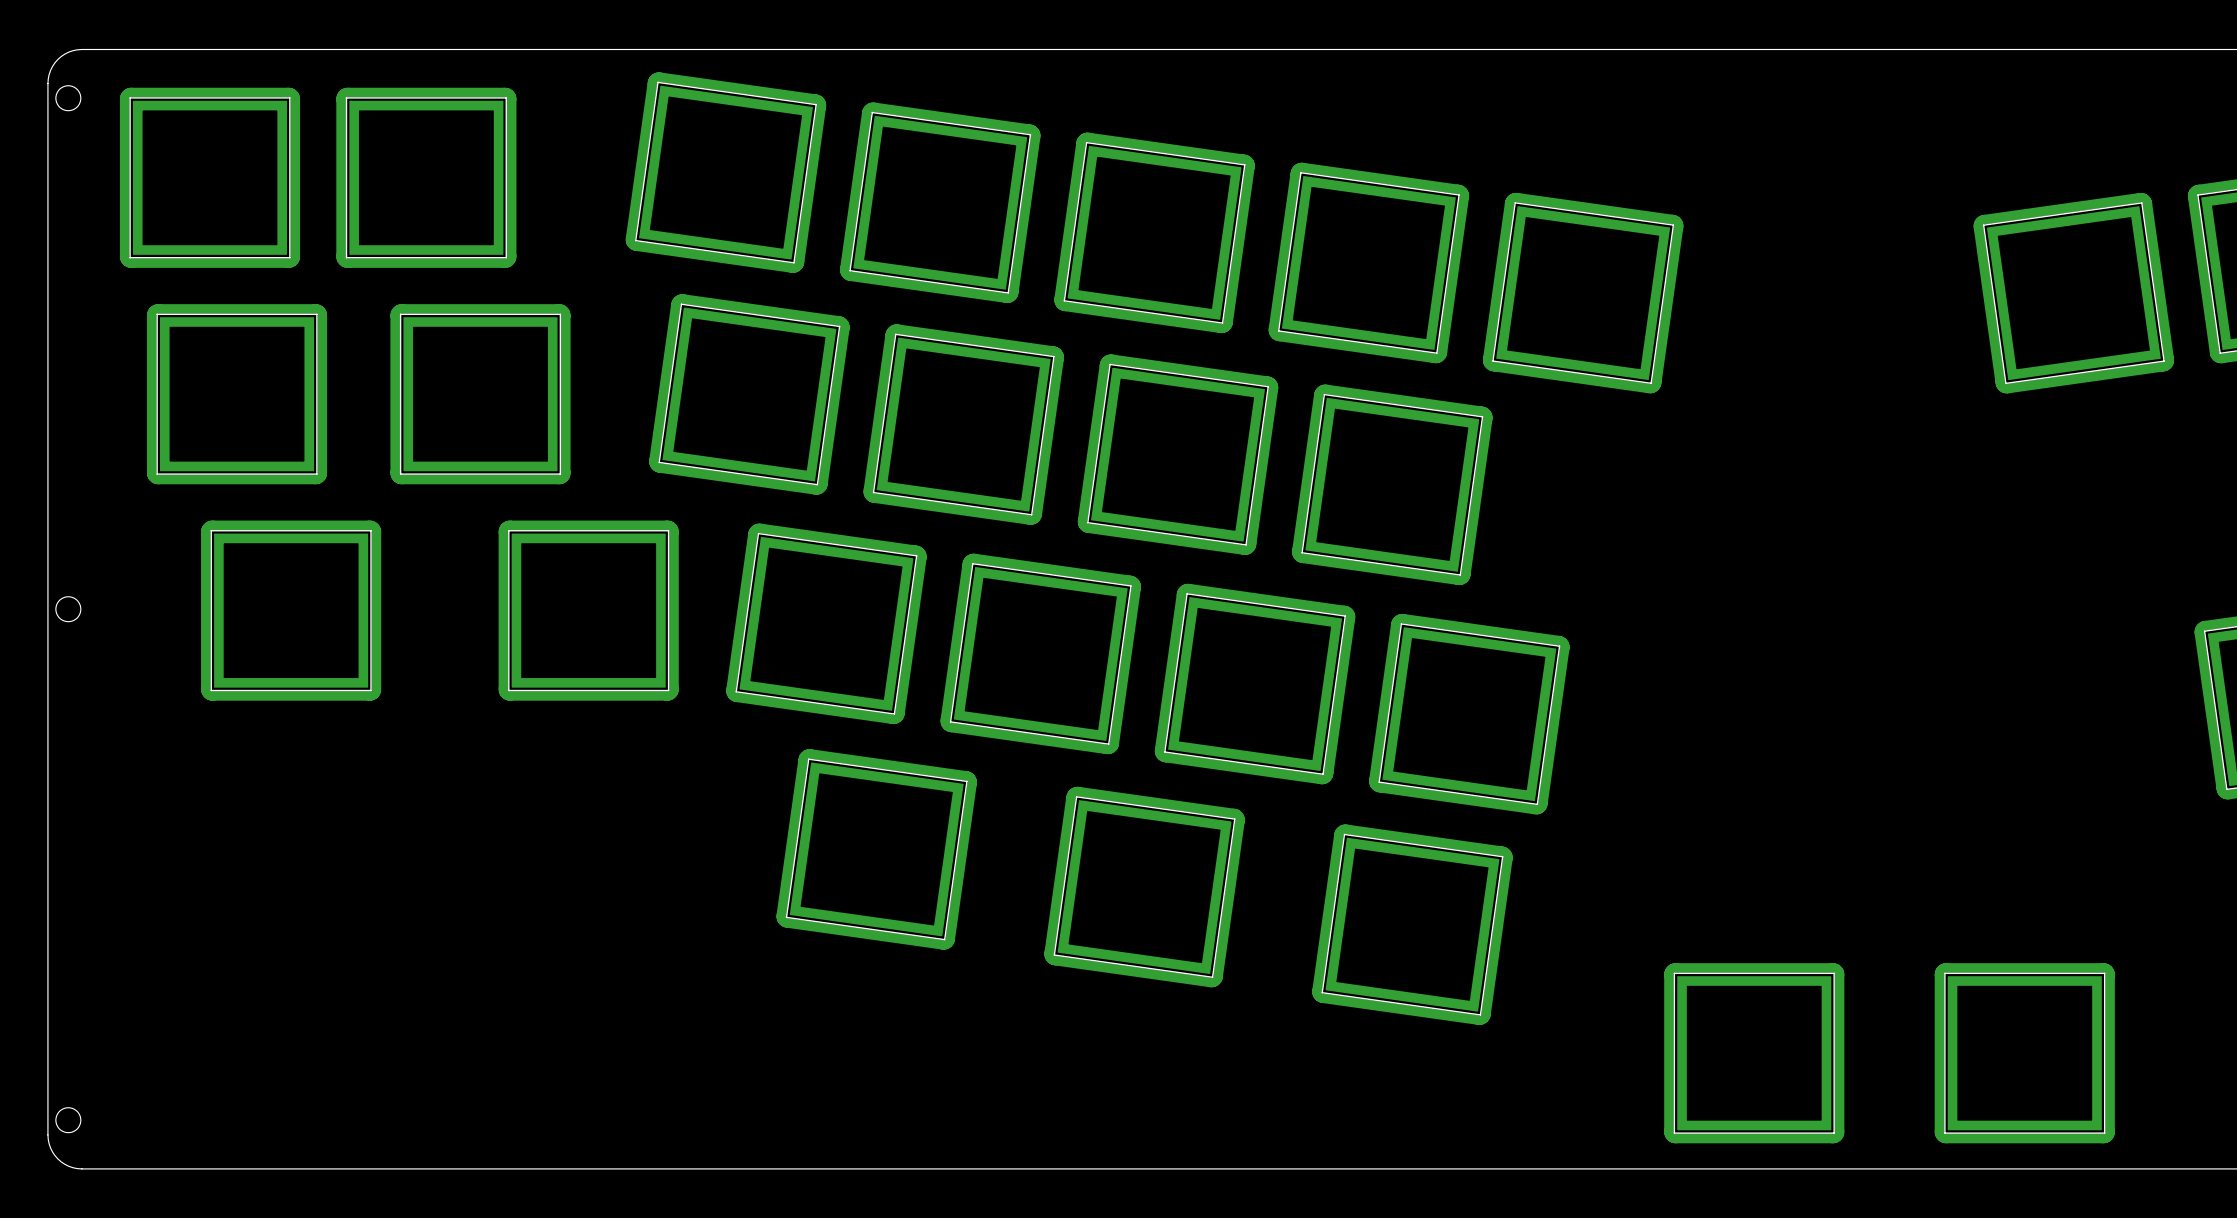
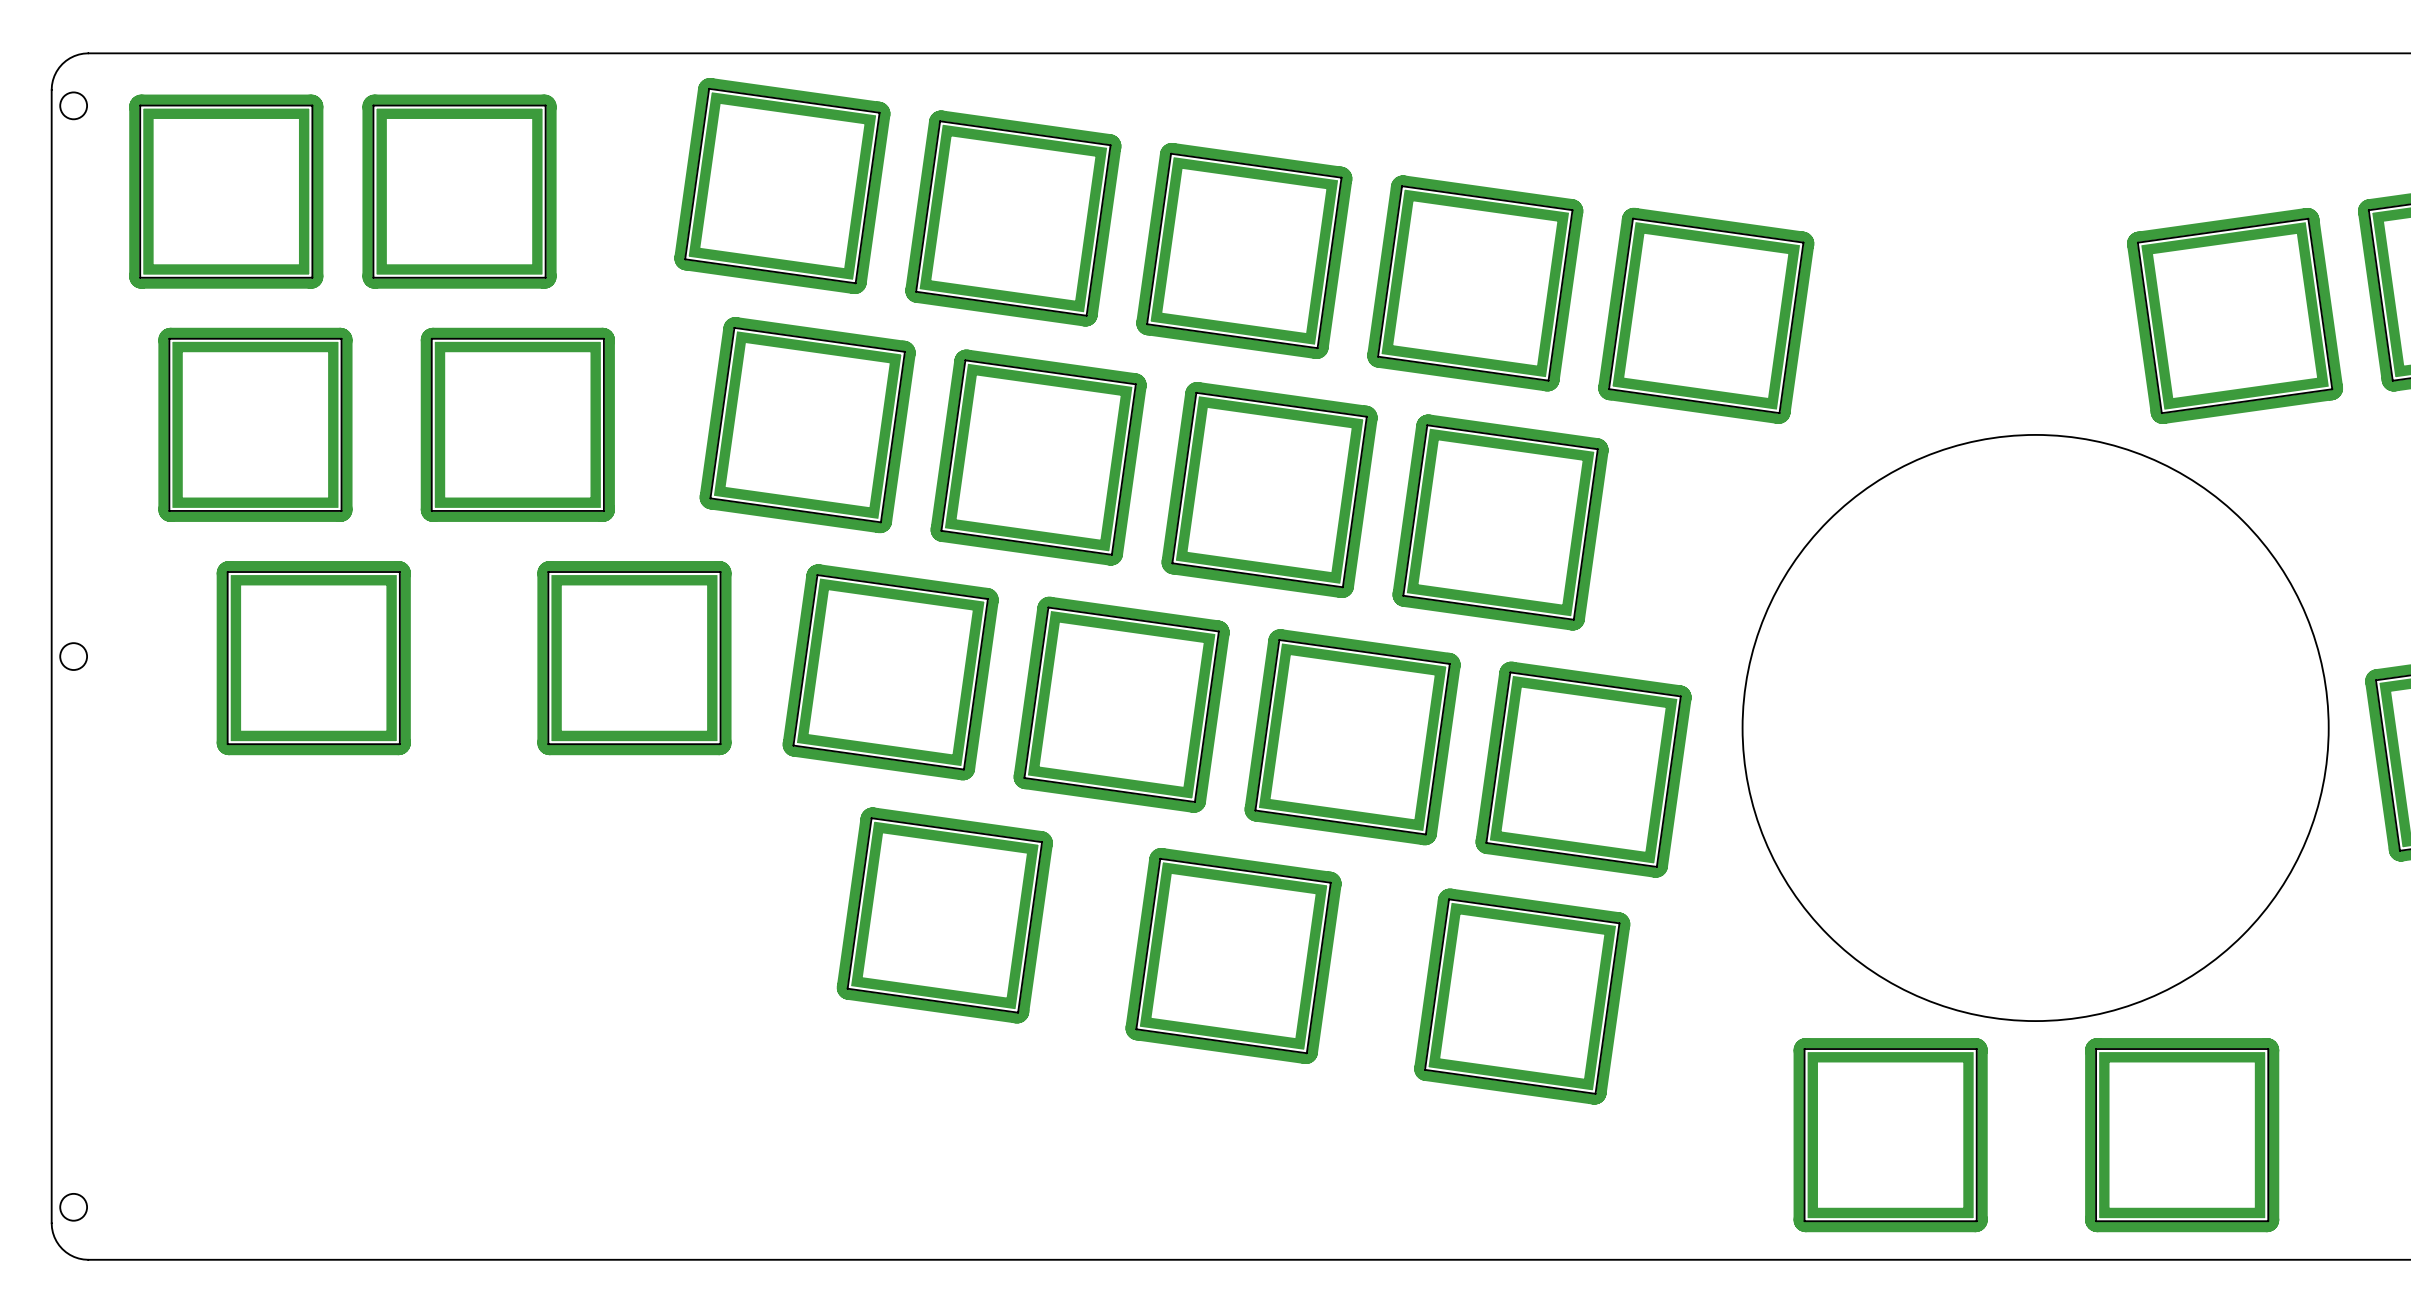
round board edge: none -> [1741, 434, 2330, 1022]

